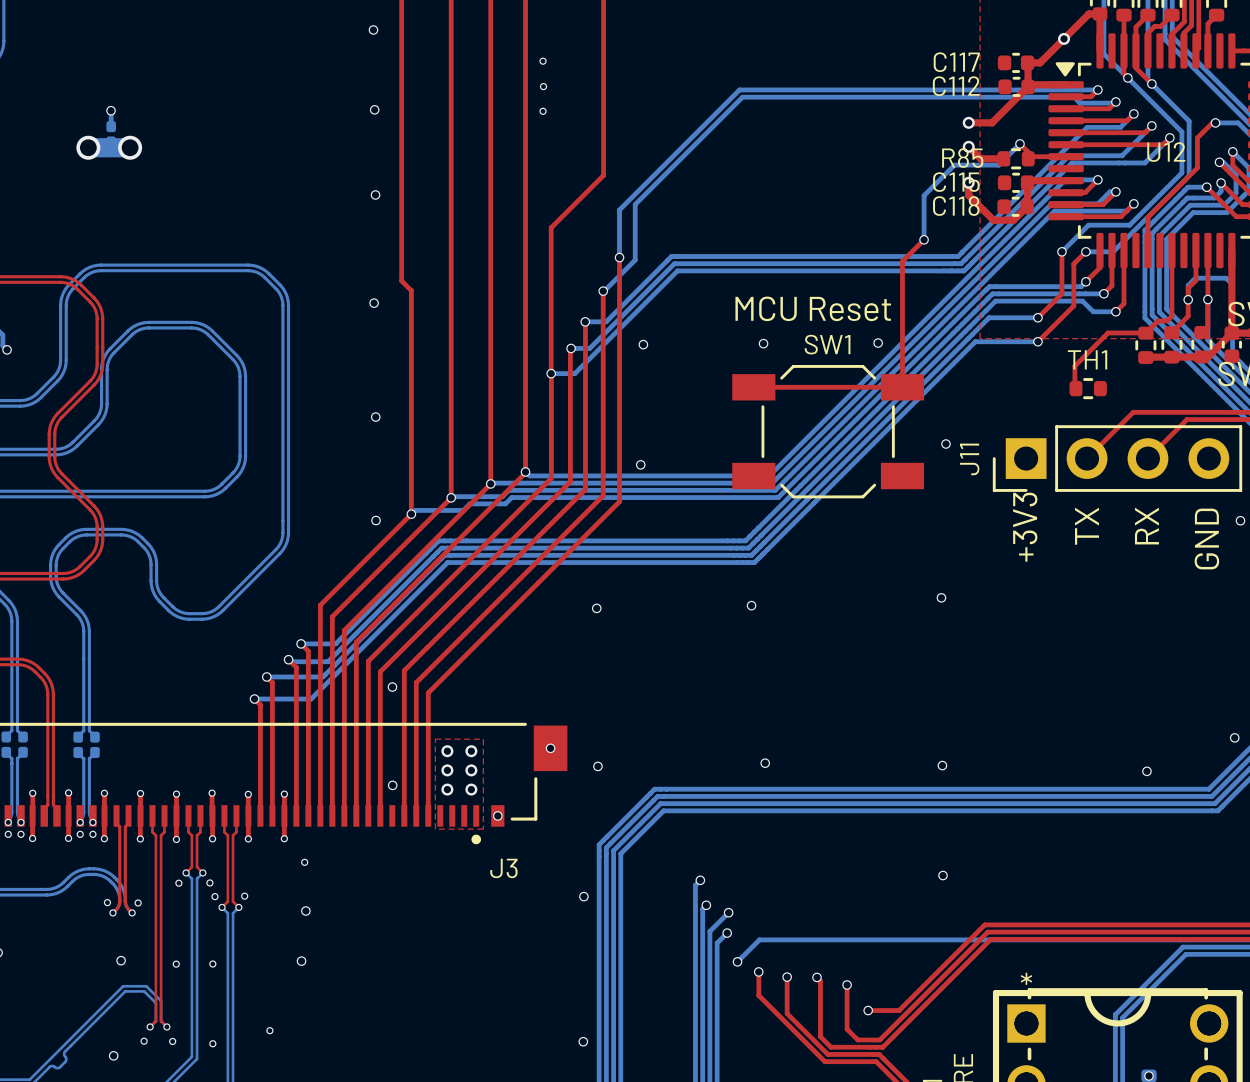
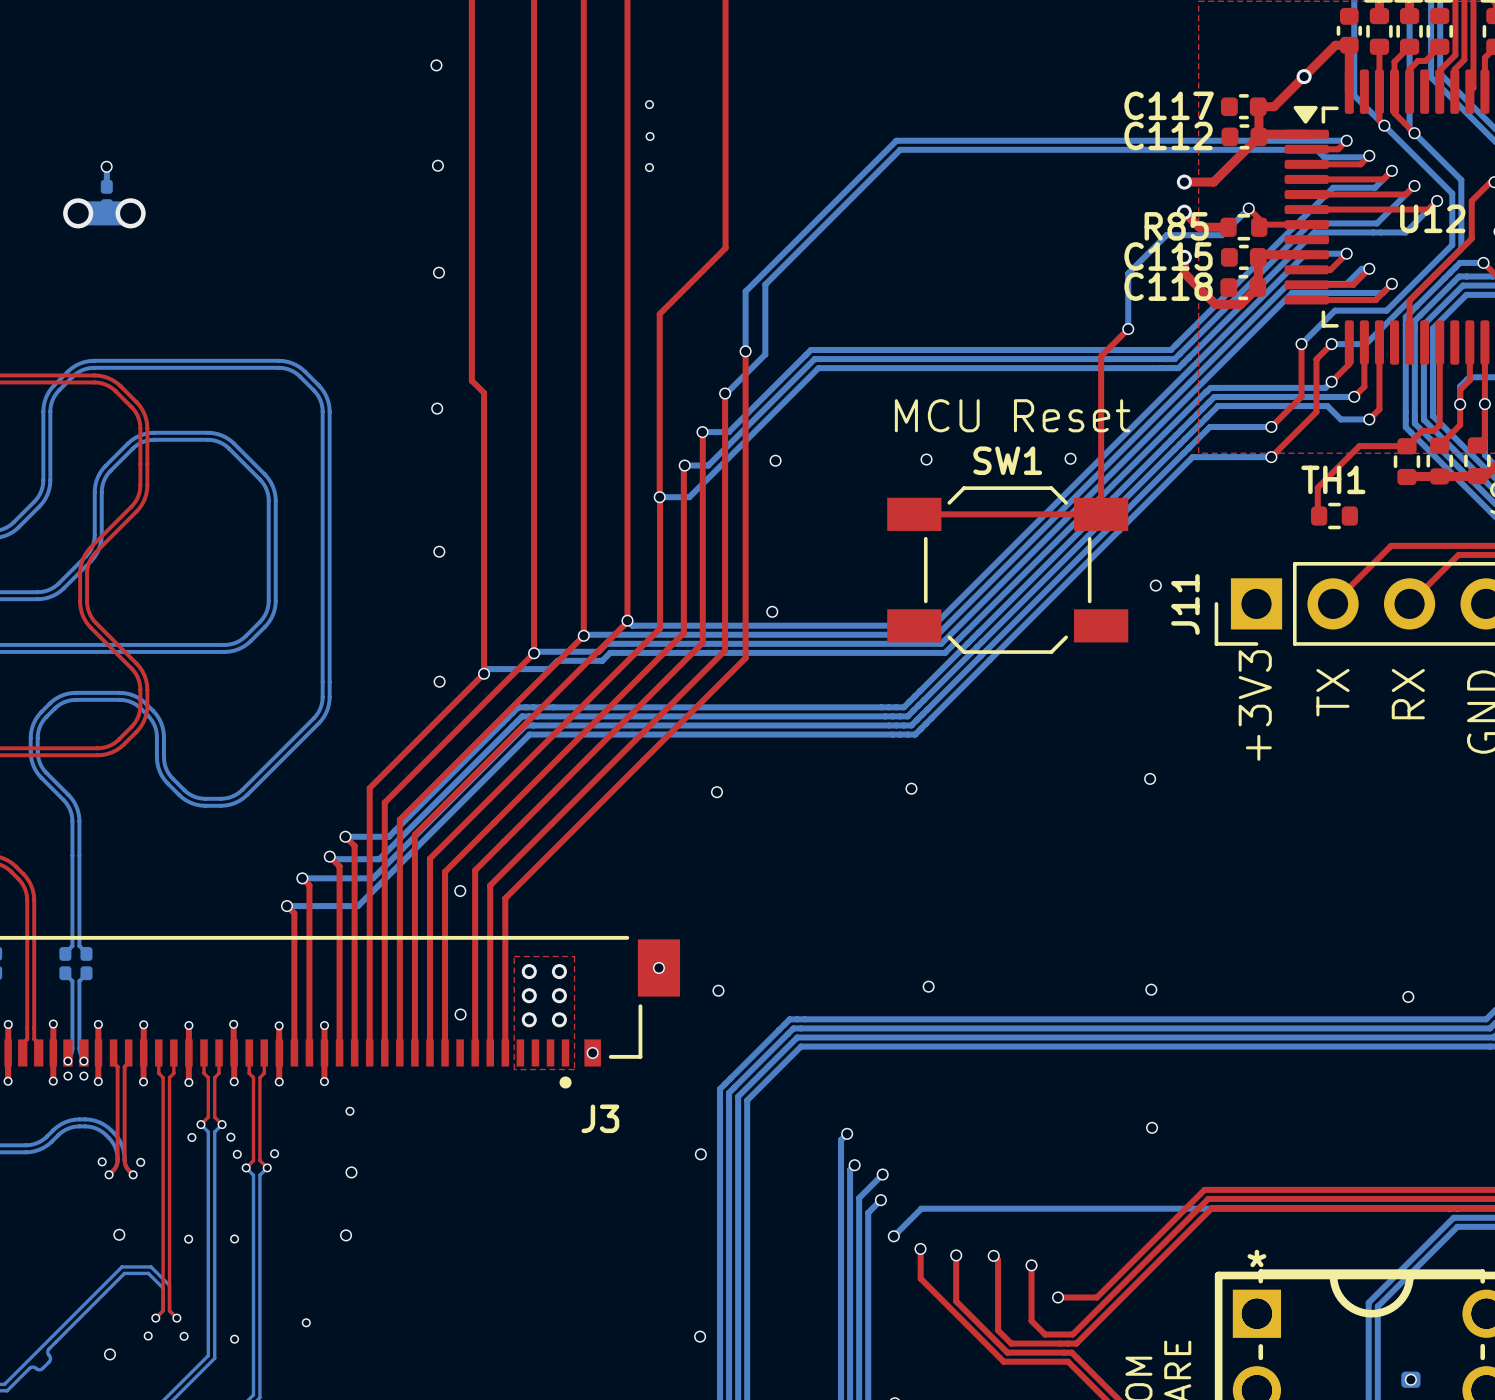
top track: (60, 276) (77, 281) (94, 297) (100, 307) (102, 318) (102, 364) (100, 375) (94, 385) (60, 419) (54, 434) (56, 465) (98, 512) (102, 523) (102, 545) (96, 558) (81, 572) (70, 578) (63, 579) -> (43, 375) (98, 375) (111, 379) (139, 405) (144, 414) (147, 428) (147, 485) (144, 499) (136, 511) (93, 554) (89, 561) (87, 573) (87, 604) (90, 615) (136, 663) (144, 675) (147, 689) (145, 716) (136, 731) (120, 747) (111, 752) (97, 755) (46, 755)
top track: (60, 282) (69, 284) (77, 289) (93, 305) (97, 318) (97, 364) (95, 373) (55, 416) (49, 430) (49, 459) (52, 470) (91, 511) (97, 524) (97, 541) (93, 552) (76, 569) (63, 573) -> (43, 382) (97, 382) (108, 386) (133, 409) (139, 419) (140, 428) (140, 485) (138, 496) (131, 506) (87, 550) (81, 563) (80, 573) (80, 605) (82, 615) (88, 625) (136, 675) (140, 686) (139, 714) (131, 726) (109, 746) (97, 748) (46, 748)

